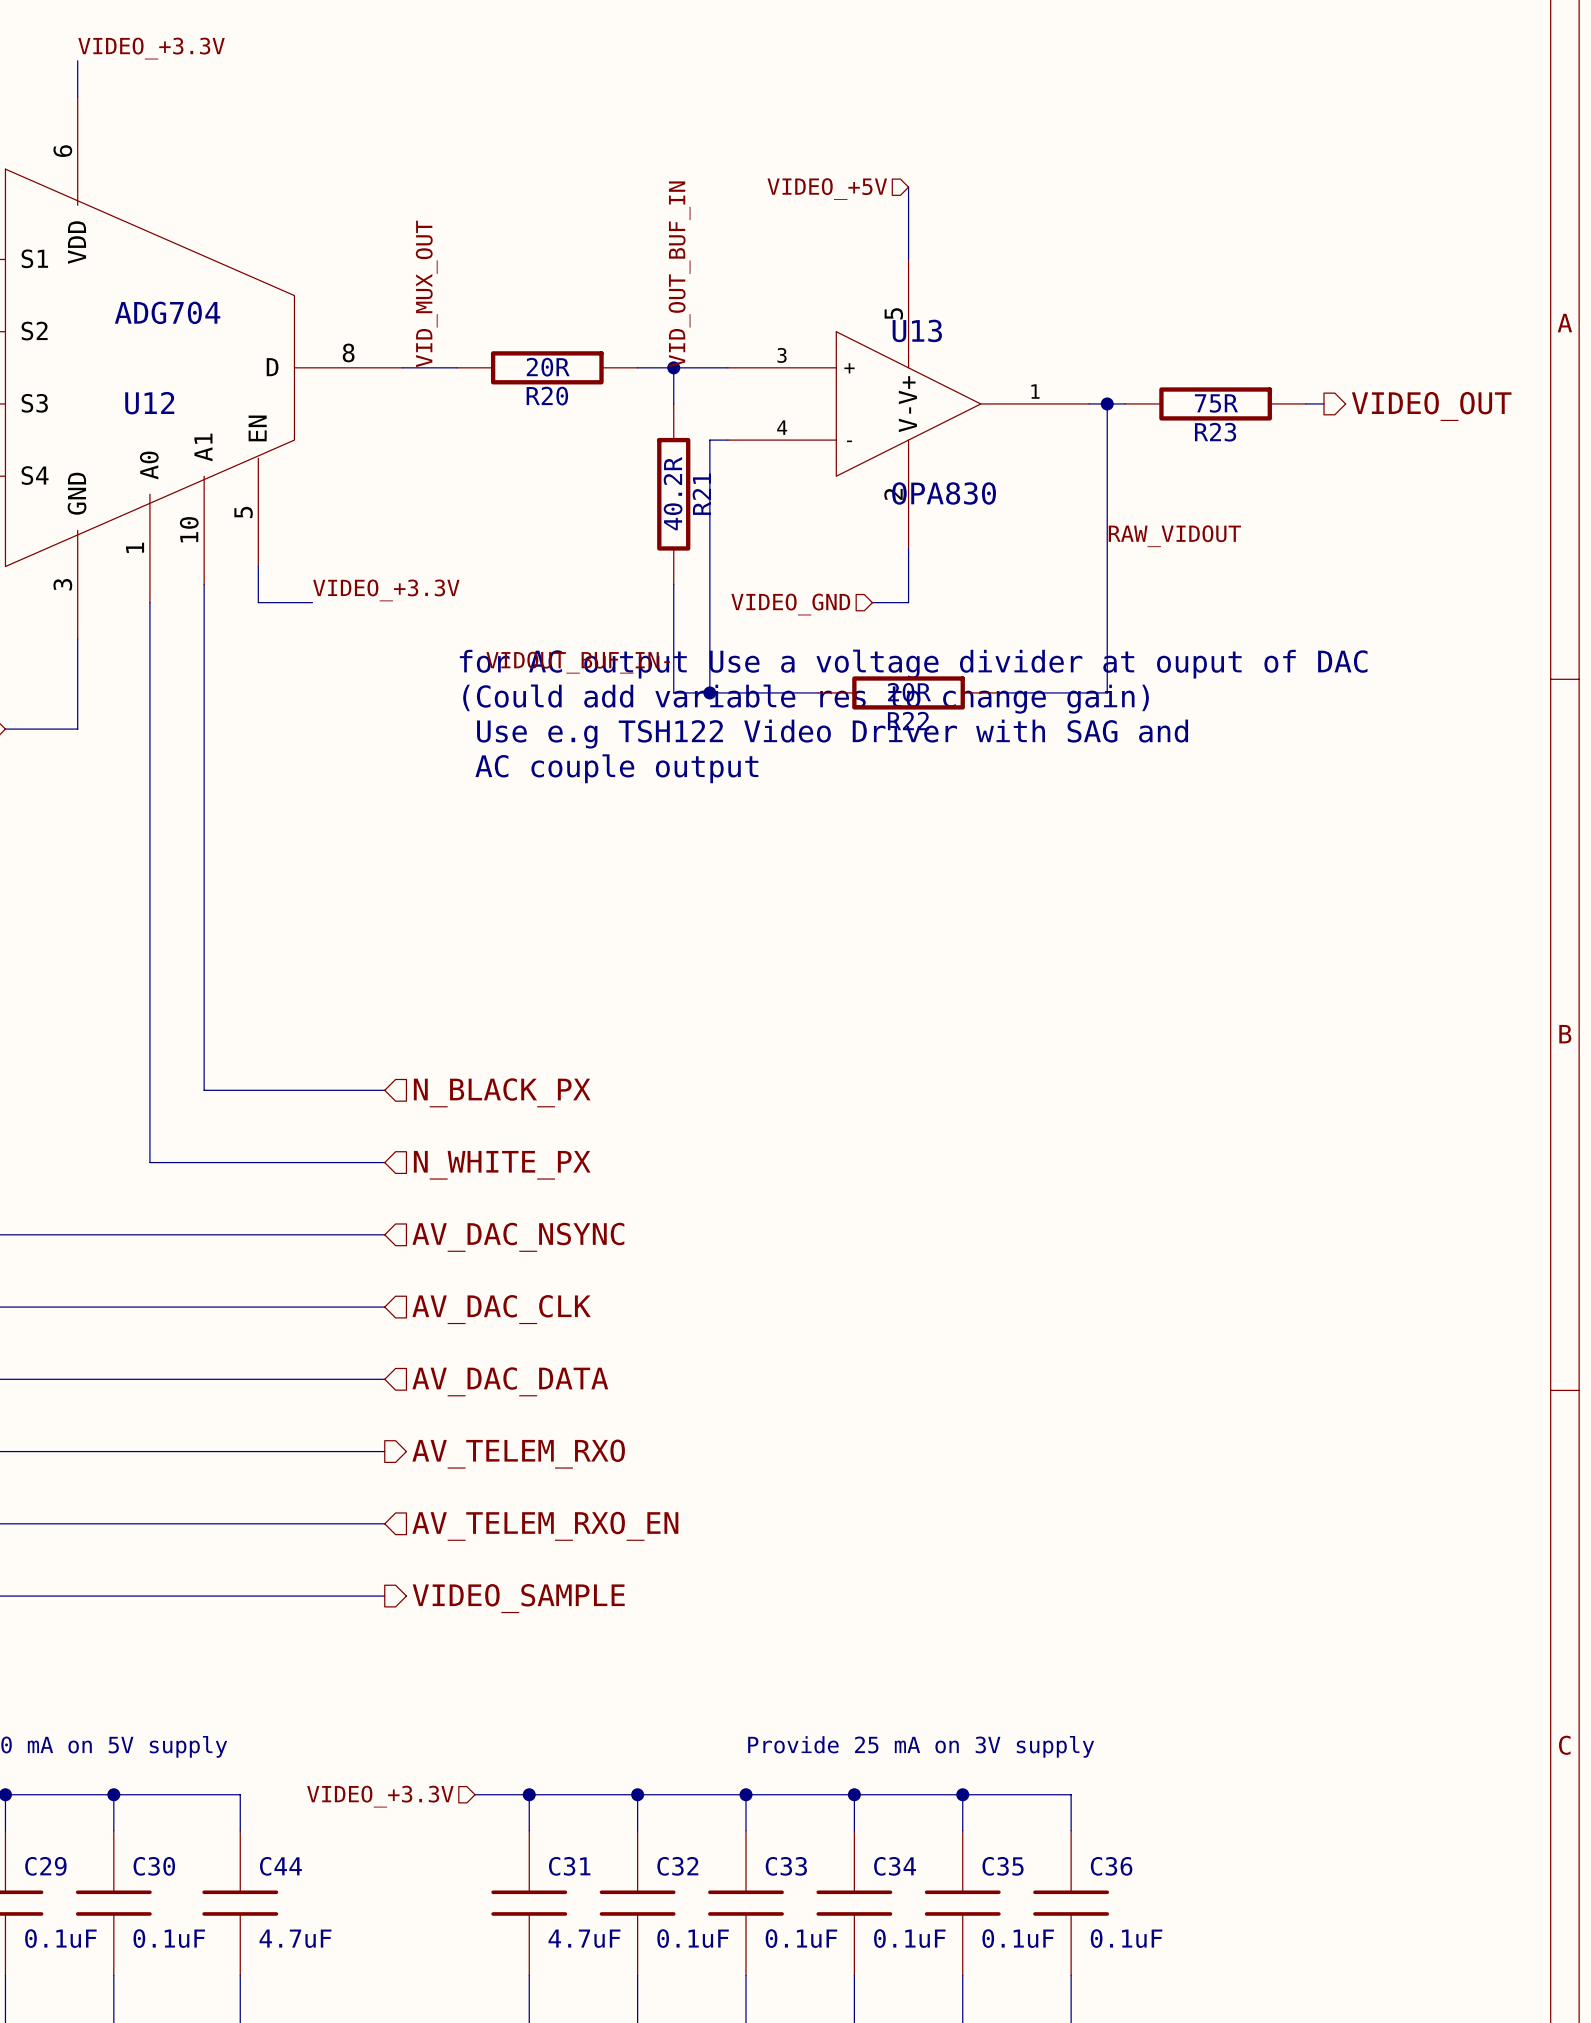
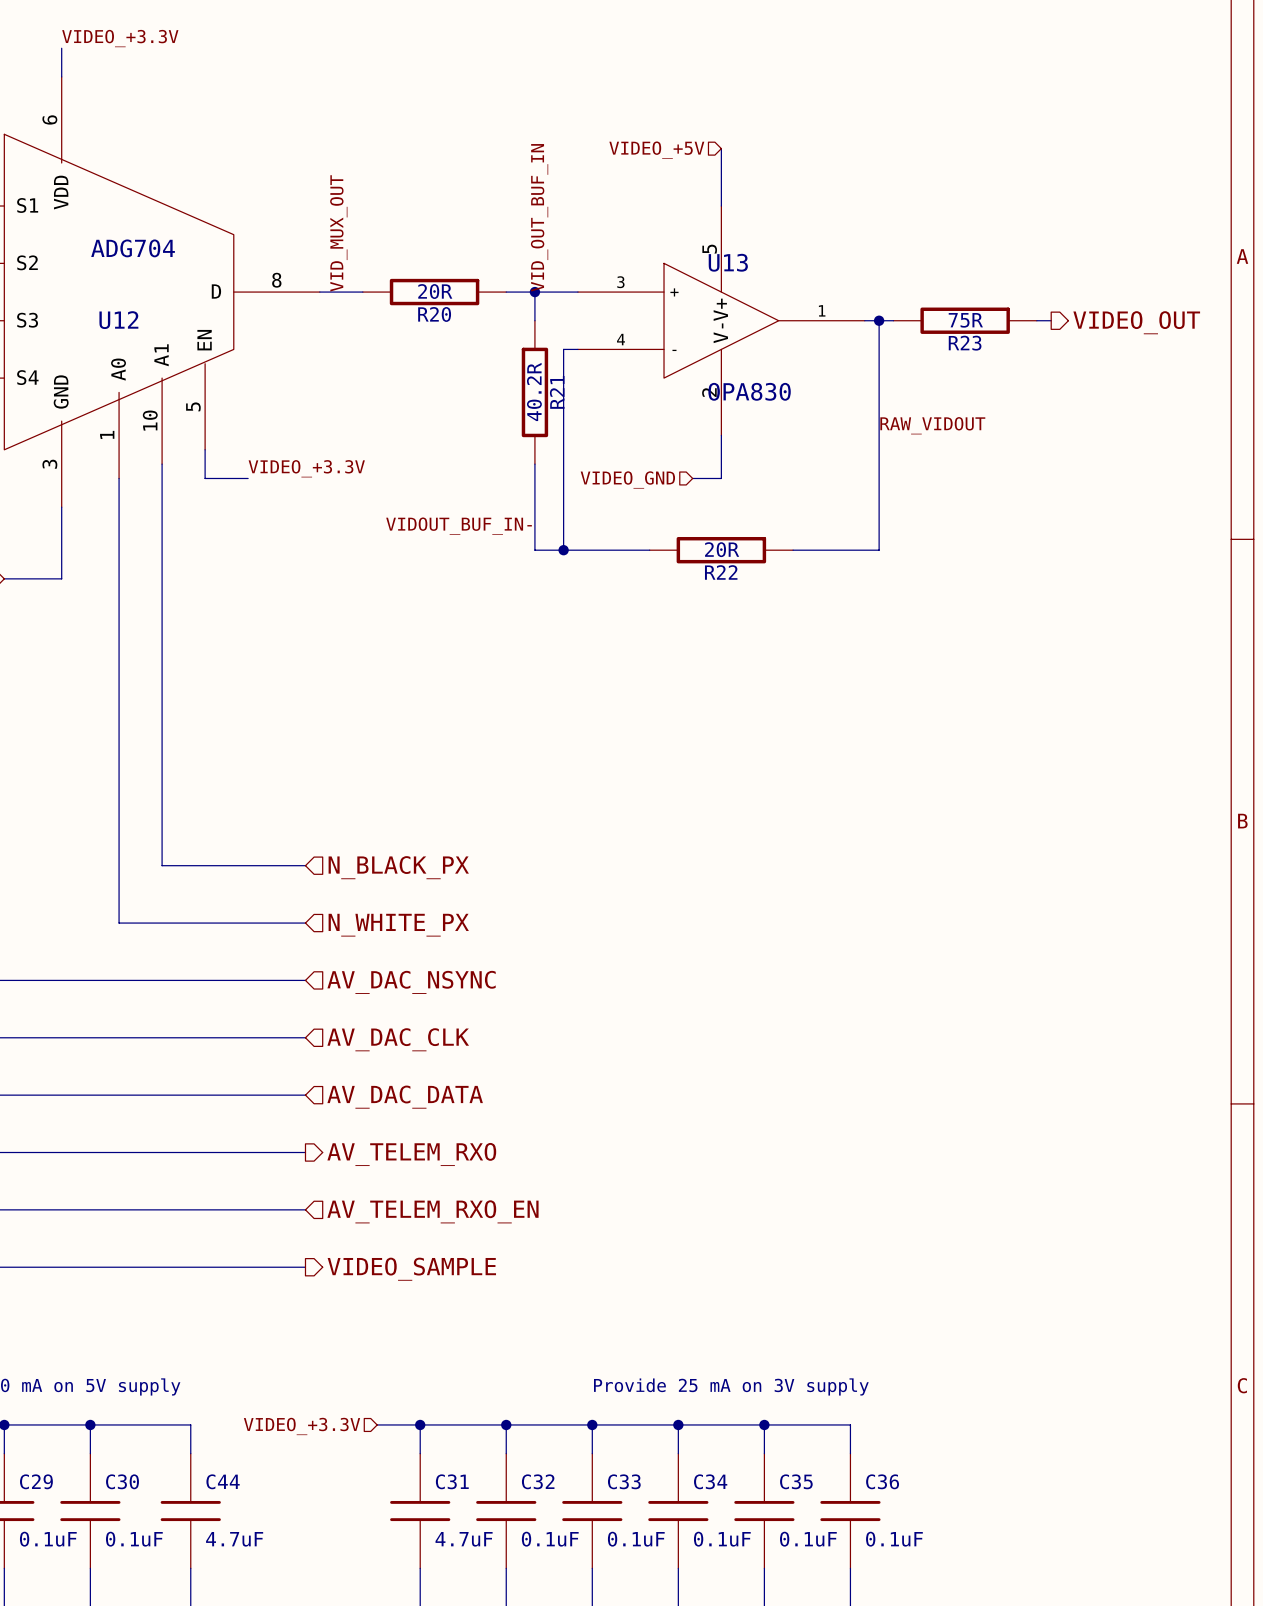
text: for AC output Use a voltage divider at ouput of DAC (913, 664) -> none
text: (Could add variable res to change gain) (806, 699) -> none
text: Use e.g TSH122 Video Driver with SAG and (832, 734) -> none
text: AC couple output (616, 768) -> none

